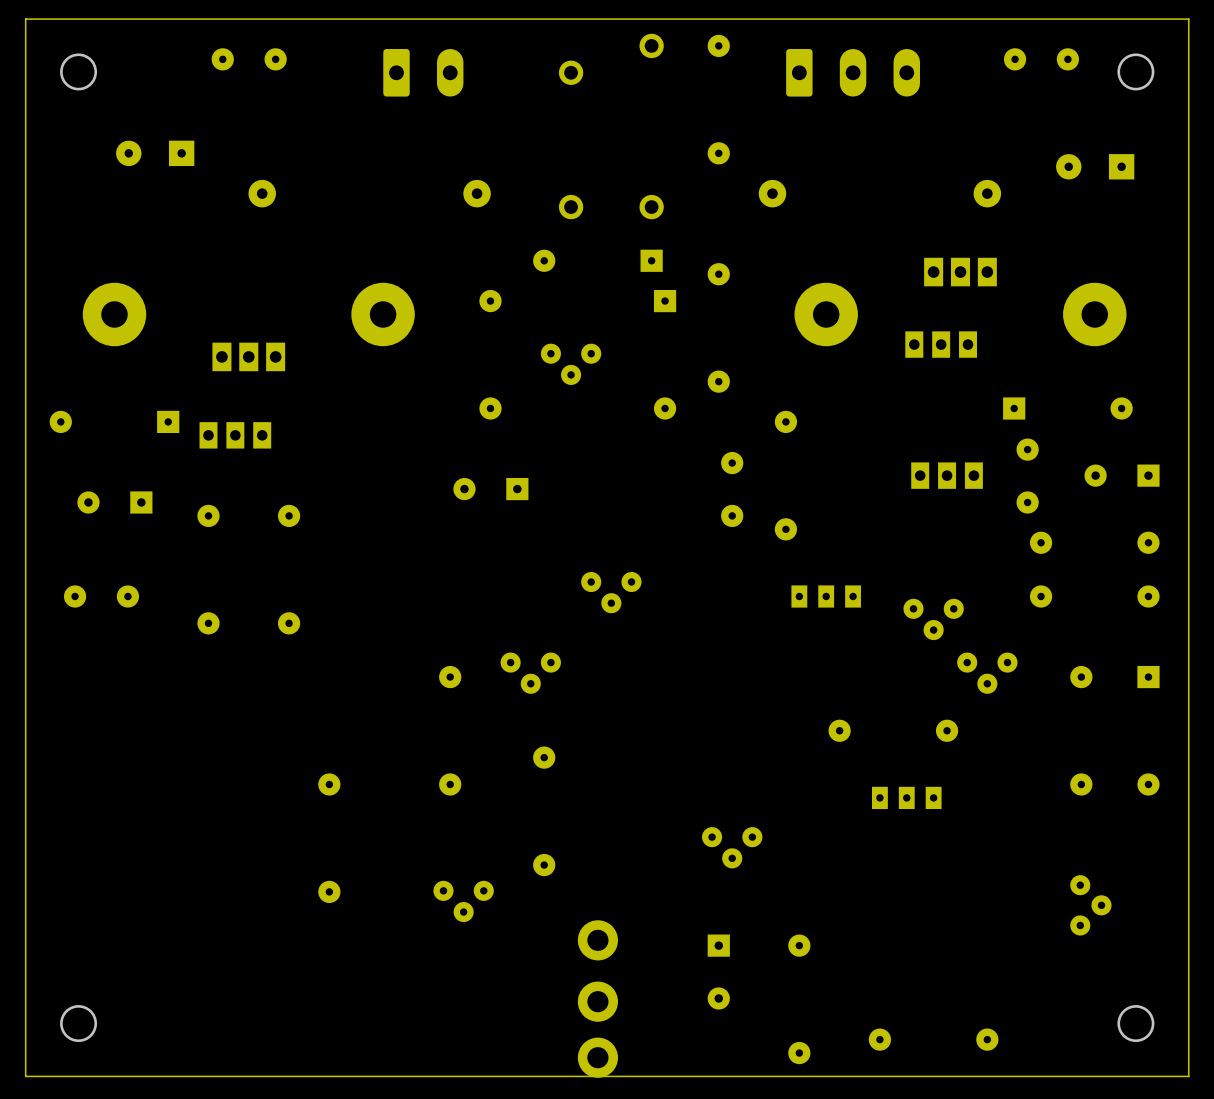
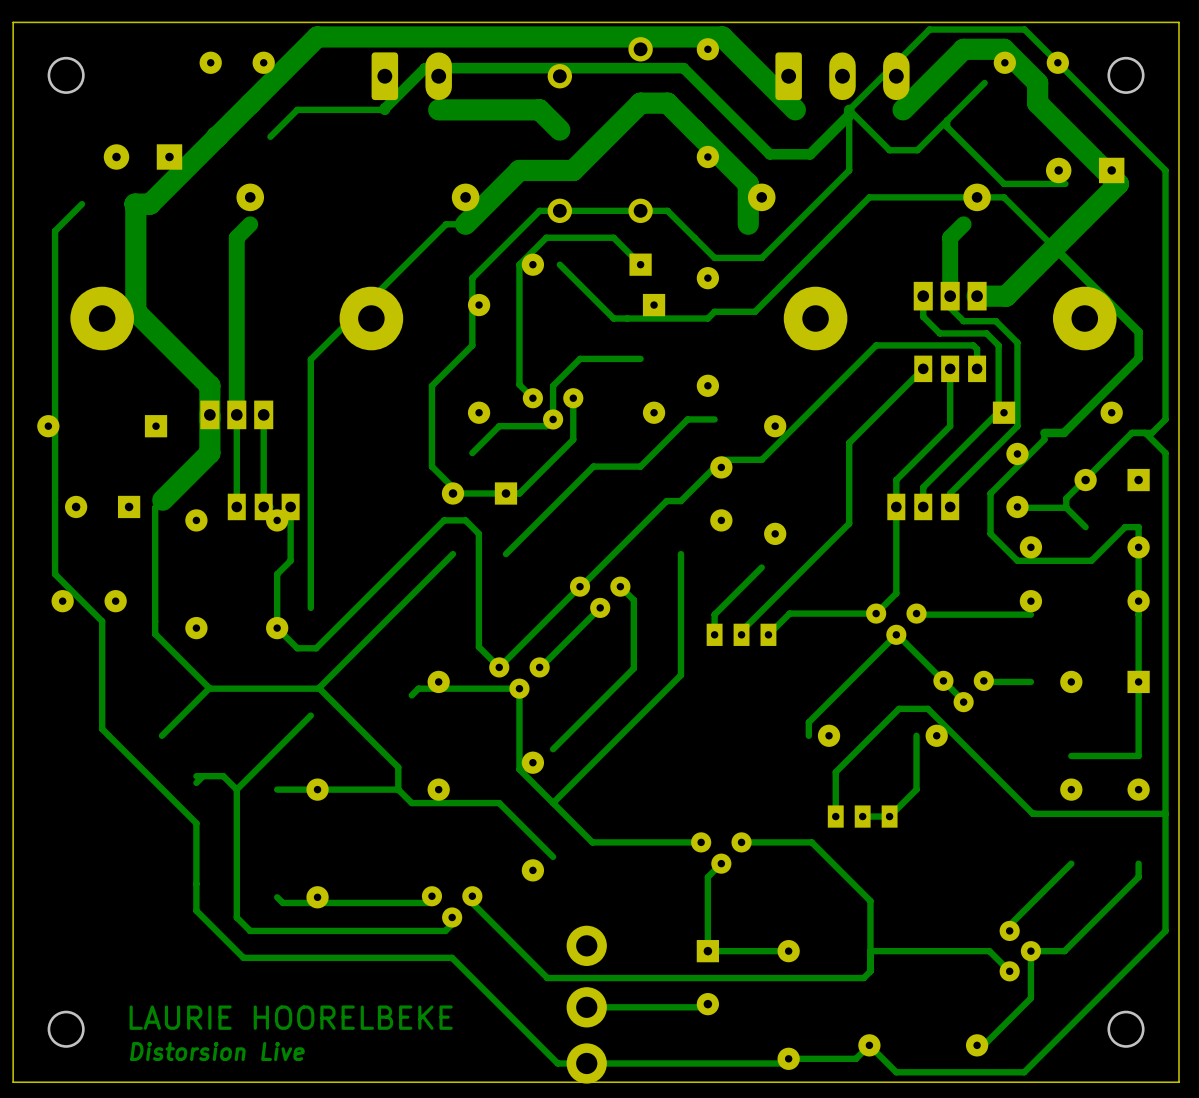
bottom track: none -> (984, 82) (917, 150) (889, 150) (849, 109)
bottom track: none -> (445, 103) (438, 109) (539, 109) (559, 130)
bottom track: none -> (795, 109) (722, 36) (317, 36) (150, 204) (134, 204) (135, 311) (209, 385) (209, 396)
bottom track: none -> (849, 109) (849, 170) (761, 257) (714, 257) (667, 210) (539, 210) (472, 278) (472, 345) (431, 385) (431, 466) (458, 493) (519, 493) (573, 439) (573, 398)
bottom track: none -> (849, 109) (929, 29) (1024, 29) (1165, 170) (1165, 419) (1152, 432) (1131, 432) (1066, 498) (1066, 507)
bottom track: none -> (849, 109) (849, 115) (810, 154) (769, 154) (683, 68) (425, 68) (384, 109) (297, 109) (270, 136)
bottom track: none -> (903, 109) (963, 49) (1004, 49) (1037, 82) (1037, 103) (1118, 183) (1006, 296) (977, 296)
bottom track: none -> (947, 120) (947, 127) (1004, 183) (1065, 183)
bottom track: none -> (81, 204) (55, 231) (55, 574) (102, 621) (102, 729) (196, 823) (196, 910) (243, 957) (452, 957) (557, 1063) (783, 1063) (788, 1058) (855, 1058) (869, 1045) (896, 1072) (1024, 1072) (1165, 930) (1165, 453) (1145, 432)
bottom track: none -> (250, 224) (236, 237) (236, 506)
bottom track: none -> (748, 224) (748, 183) (667, 103) (640, 103) (573, 170) (519, 170) (465, 224) (446, 224) (310, 359) (310, 607)
bottom track: none -> (963, 224) (950, 237) (950, 307) (963, 321) (995, 321) (1017, 342) (1017, 426) (950, 493) (950, 506)
bottom track: none -> (559, 264) (613, 318) (707, 318) (714, 311) (755, 311) (869, 197) (1004, 197) (1138, 331) (1138, 358) (1064, 432) (1044, 432) (1044, 439) (990, 493) (990, 533) (1017, 560) (1091, 560) (1125, 527) (1138, 527) (1138, 755) (1071, 755)
bottom track: none -> (640, 264) (613, 237) (546, 237) (519, 264) (519, 384) (532, 398)
part position: (960, 272) -> (950, 296)
bottom track: none -> (923, 296) (923, 316) (939, 333) (986, 333) (998, 345) (998, 411) (923, 487) (923, 506)
part position: (941, 344) -> (950, 368)
bottom track: none -> (640, 358) (580, 358) (553, 385) (553, 419) (546, 426) (499, 426) (472, 453)
part position: (248, 356) -> (236, 414)
part position: (571, 364) -> (553, 408)
bottom track: none -> (923, 368) (849, 442) (849, 523) (741, 631) (741, 634)
bottom track: none -> (950, 368) (950, 426) (896, 480) (896, 593) (876, 613) (789, 613) (768, 634)
bottom track: none -> (977, 368) (977, 349) (973, 345) (876, 345) (761, 459) (722, 459) (680, 501) (666, 501) (499, 667) (478, 647) (478, 533) (465, 520) (444, 520) (316, 648) (297, 648) (277, 628) (277, 574) (290, 560) (290, 506)
bottom track: none -> (209, 401) (209, 453) (155, 507) (155, 633) (209, 688)
bottom track: none -> (263, 414) (263, 506)
bottom track: none -> (714, 419) (687, 419) (640, 466) (593, 466) (505, 554)
part position: (235, 435) -> (263, 506)
part position: (947, 475) -> (923, 506)
bottom track: none -> (1066, 507) (1085, 527)
bottom track: none -> (1066, 507) (1017, 507)
bottom track: none -> (452, 554) (319, 687) (398, 767) (398, 789)
bottom track: none -> (680, 554) (680, 675) (553, 803)
bottom track: none -> (761, 567) (714, 614) (714, 634)
bottom track: none -> (620, 586) (633, 600) (633, 668) (553, 749)
part position: (826, 596) -> (741, 634)
bottom track: none -> (600, 607) (539, 667)
bottom track: none -> (916, 613) (1030, 614)
part position: (933, 619) -> (896, 624)
part position: (987, 673) -> (963, 691)
bottom track: none -> (983, 680) (1030, 681)
bottom track: none -> (209, 688) (161, 735)
bottom track: none -> (319, 688) (209, 688)
bottom track: none -> (411, 695) (418, 688) (519, 688) (519, 769) (592, 842) (701, 842)
bottom track: none -> (963, 702) (896, 634) (808, 722) (808, 735)
bottom track: none -> (310, 715) (236, 789)
bottom track: none -> (916, 735) (916, 789) (889, 816) (862, 816)
bottom track: none -> (196, 776) (223, 776) (236, 789)
bottom track: none -> (203, 776) (196, 782)
bottom track: none -> (236, 789) (236, 917) (250, 930) (445, 930) (452, 924)
bottom track: none -> (398, 789) (411, 803) (499, 803) (553, 856)
bottom track: none -> (398, 789) (277, 789)
part position: (906, 797) -> (862, 816)
bottom track: none -> (1165, 813) (1032, 813) (927, 708) (899, 708) (835, 772) (835, 816)
bottom track: none -> (741, 842) (811, 842) (870, 901) (870, 971) (863, 978) (547, 978) (472, 902)
bottom track: none -> (721, 863) (707, 877) (707, 951) (788, 951)
bottom track: none -> (1071, 863) (1009, 925) (1009, 930)
bottom track: none -> (1138, 863) (1138, 877) (1064, 951) (1030, 951) (1030, 998) (983, 1045) (977, 1045)
bottom track: none -> (277, 897) (282, 902) (431, 902)
part position: (1090, 905) -> (1020, 951)
bottom track: none -> (870, 951) (989, 951) (1009, 971)
bottom track: none -> (707, 1004) (704, 1007) (586, 1007)
text: none -> LAURIE HOORELBEKE (291, 1017)
text: none -> Distorsion Live (217, 1051)

